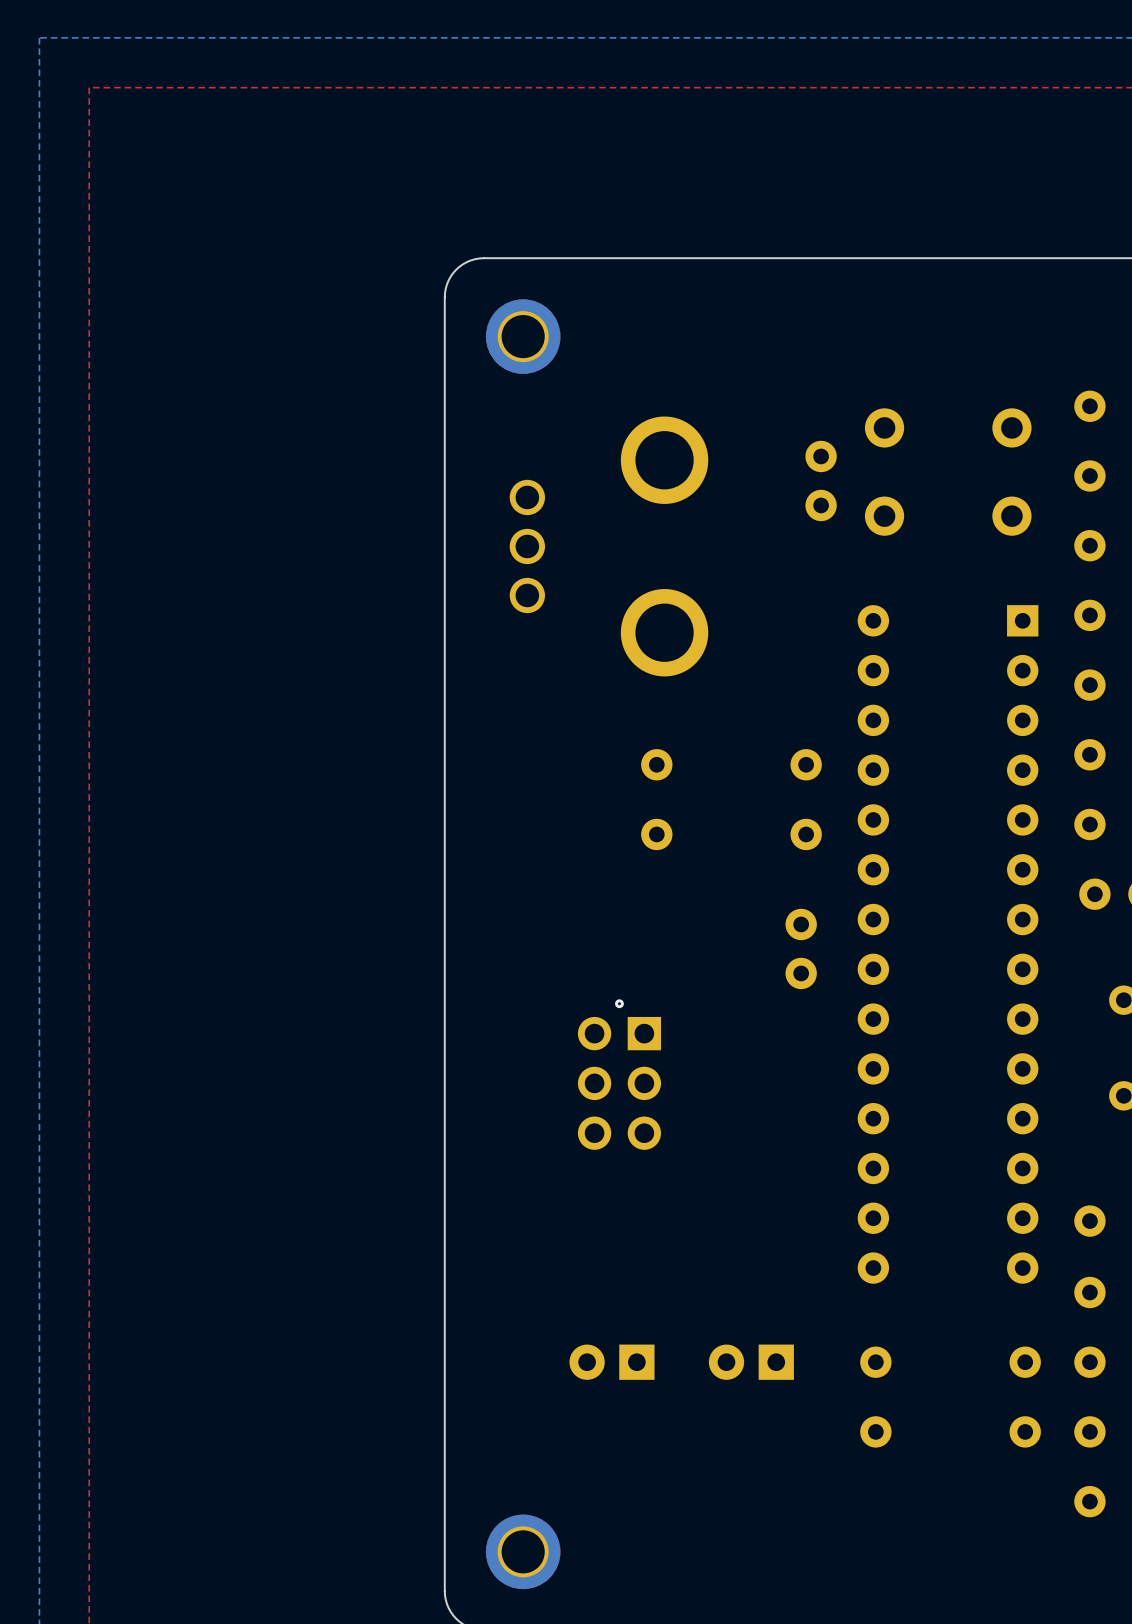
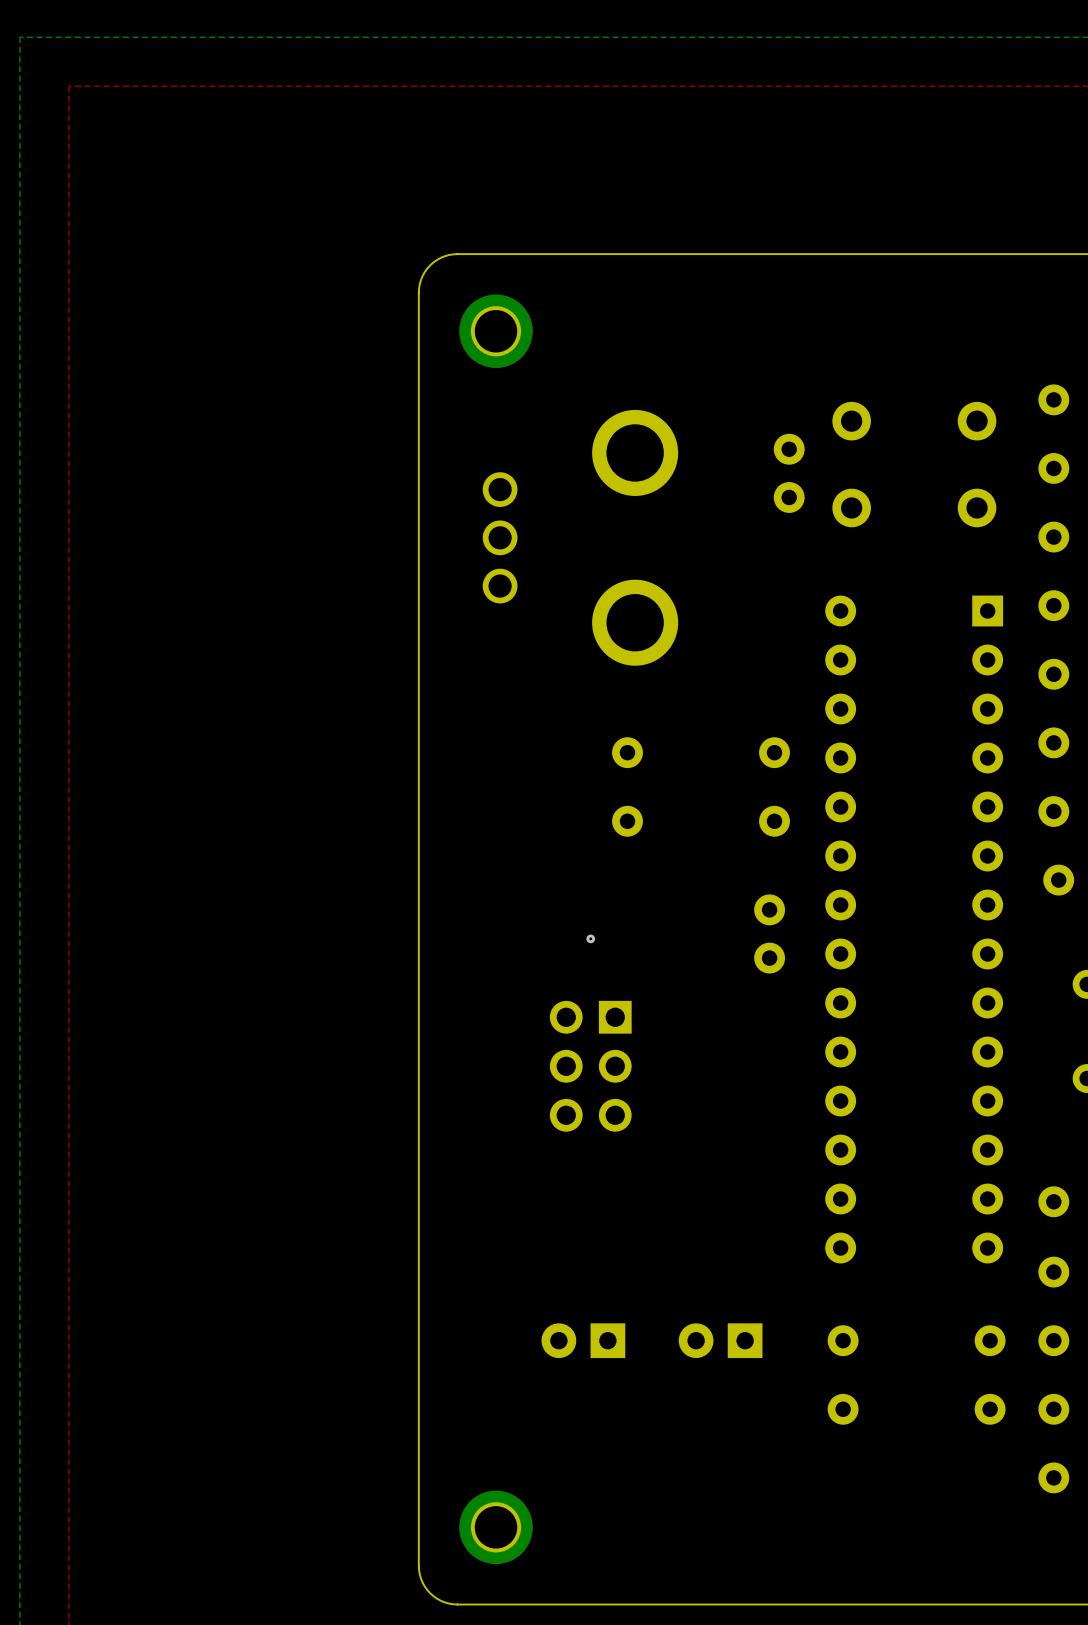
via position: (619, 1003) -> (590, 938)

